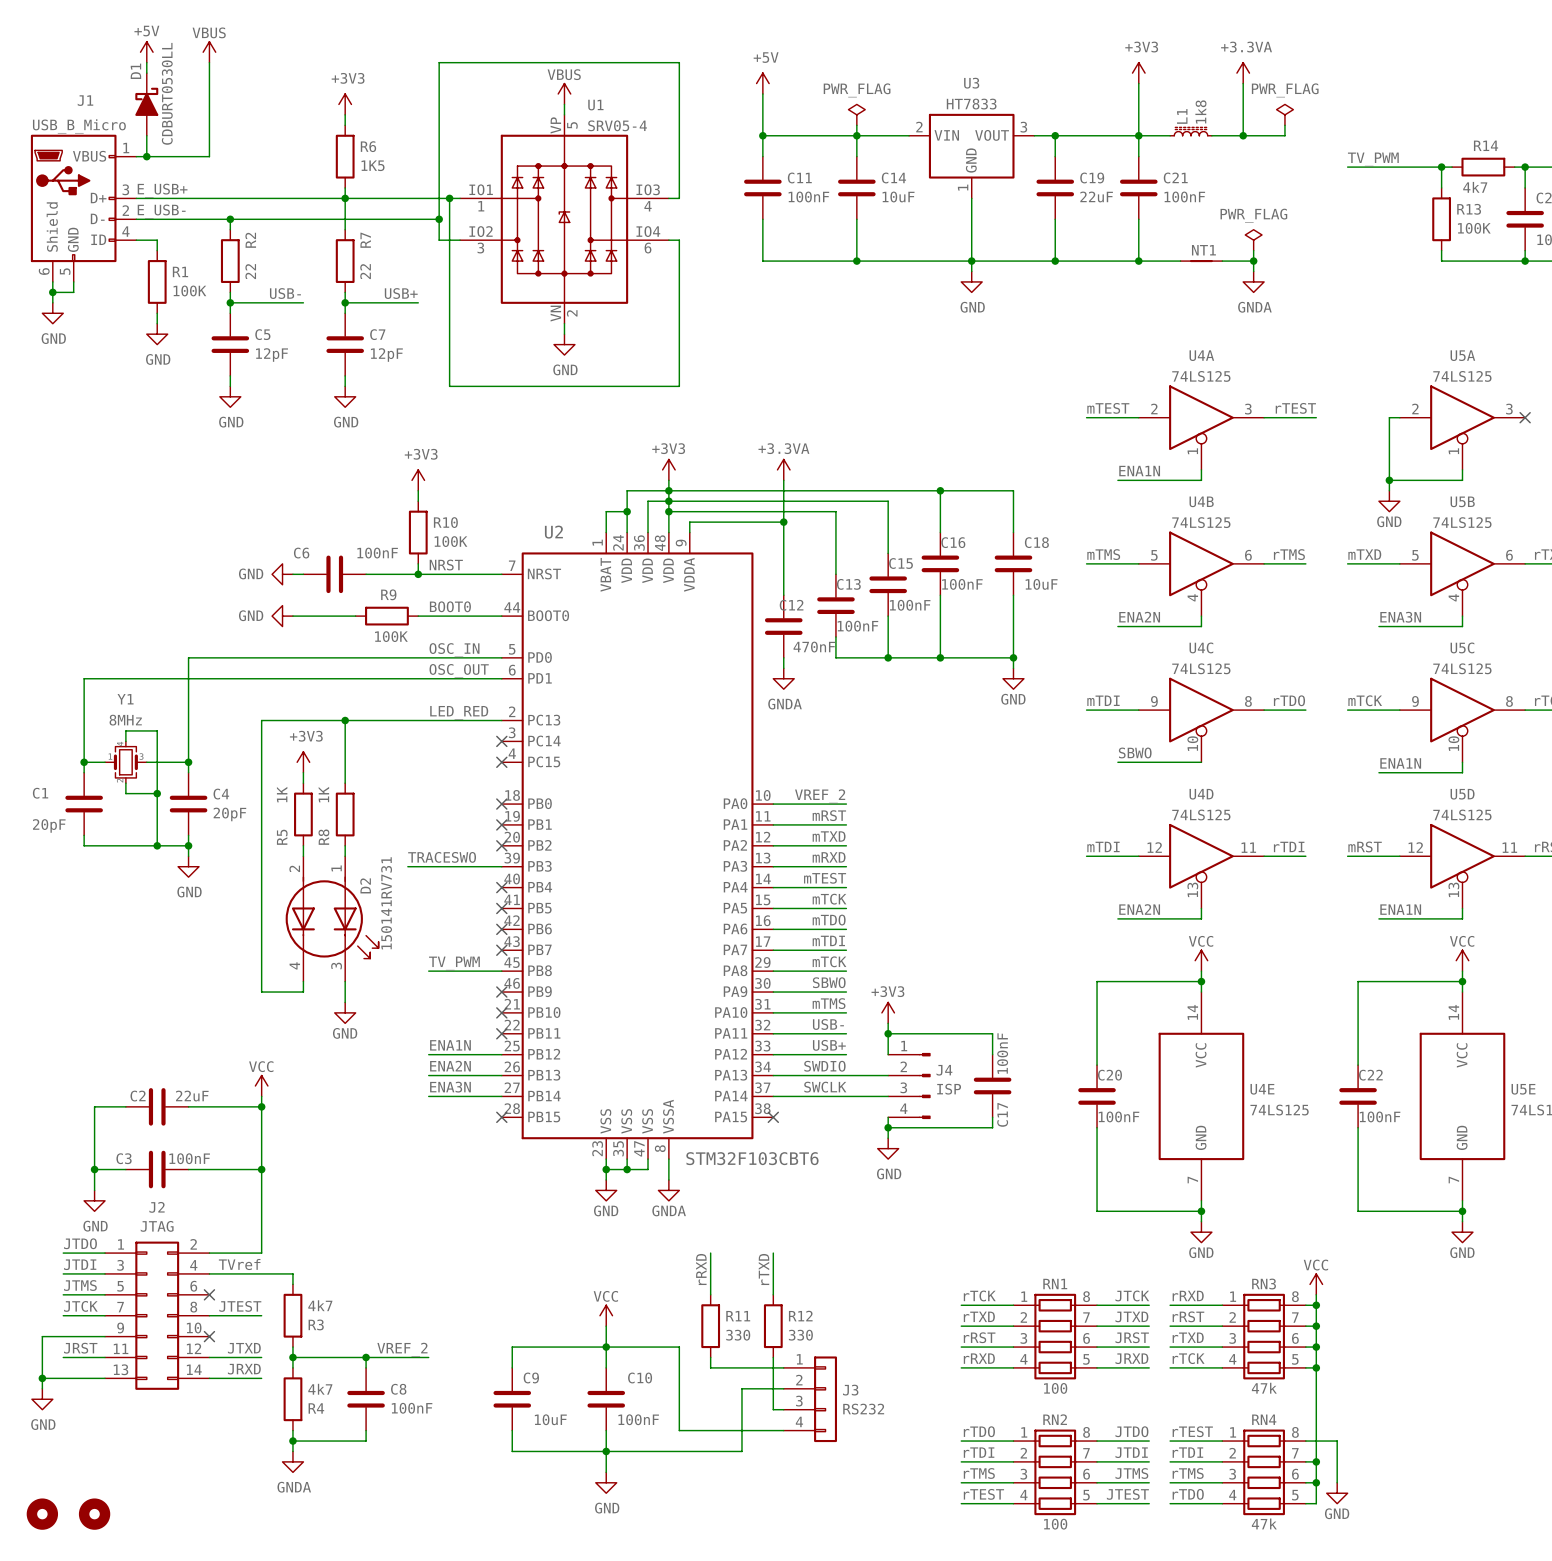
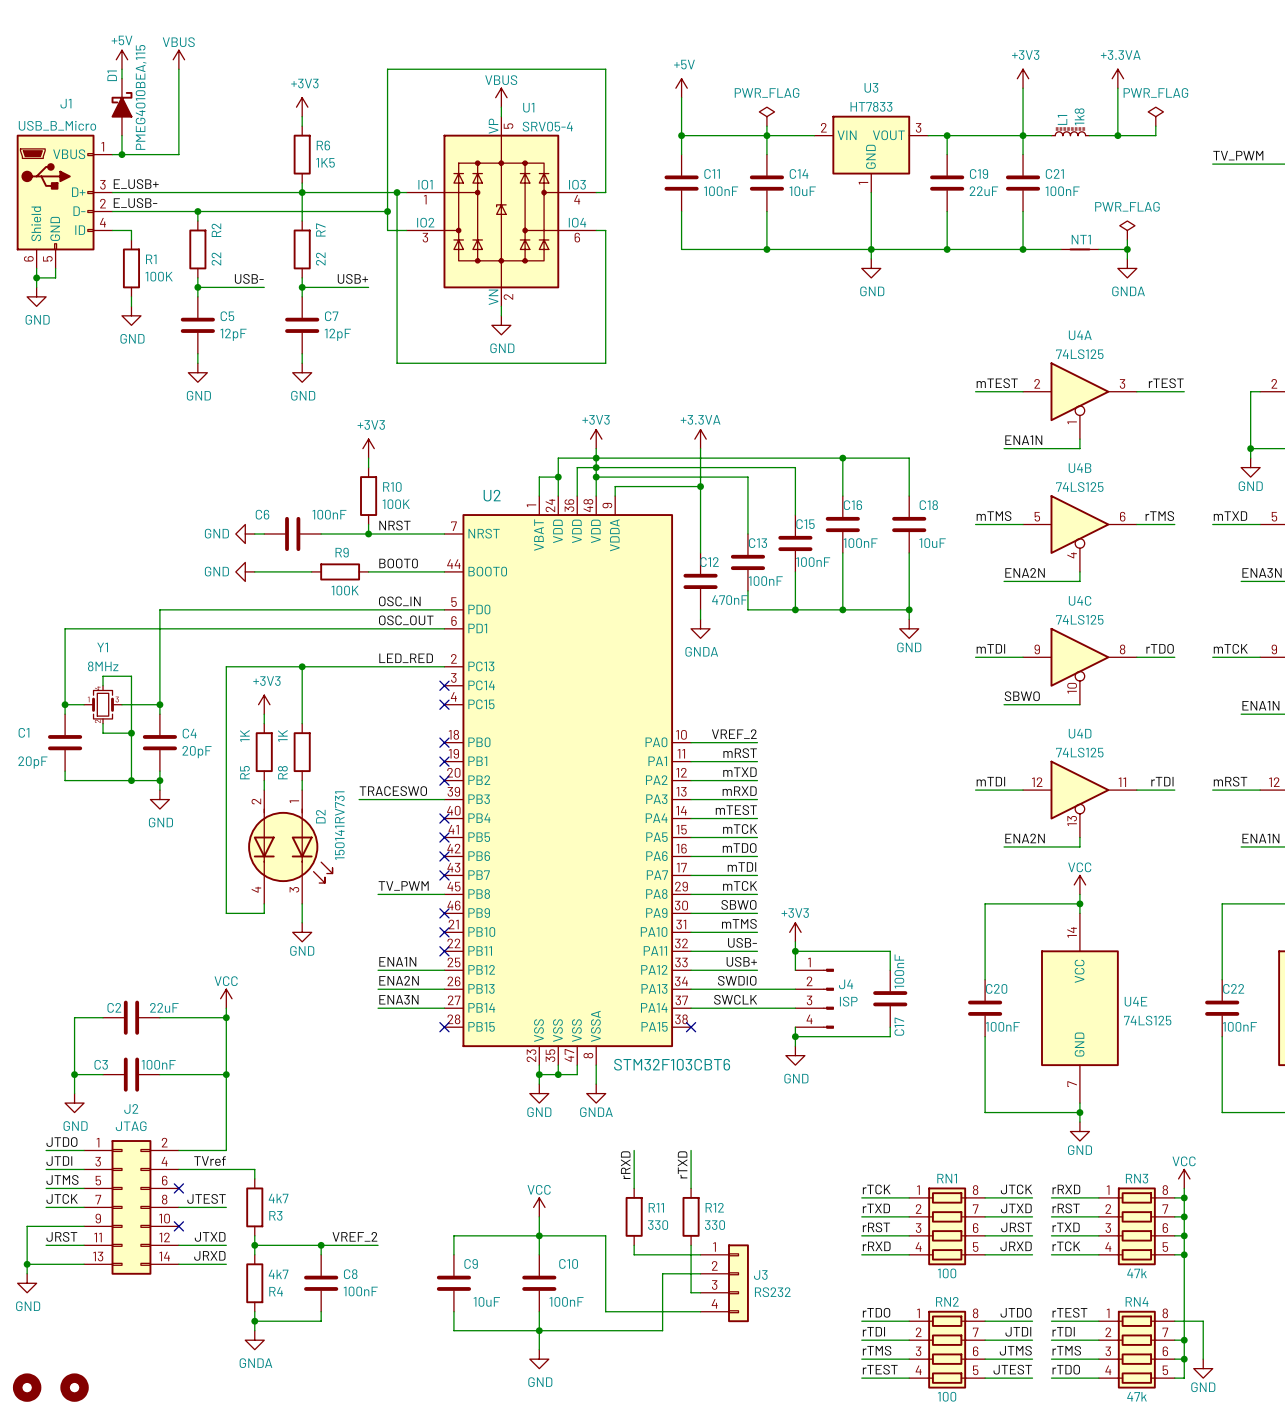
D1 value: CDBURT0530LL (167, 93) -> PMEG4010BEA,115 (141, 97)

